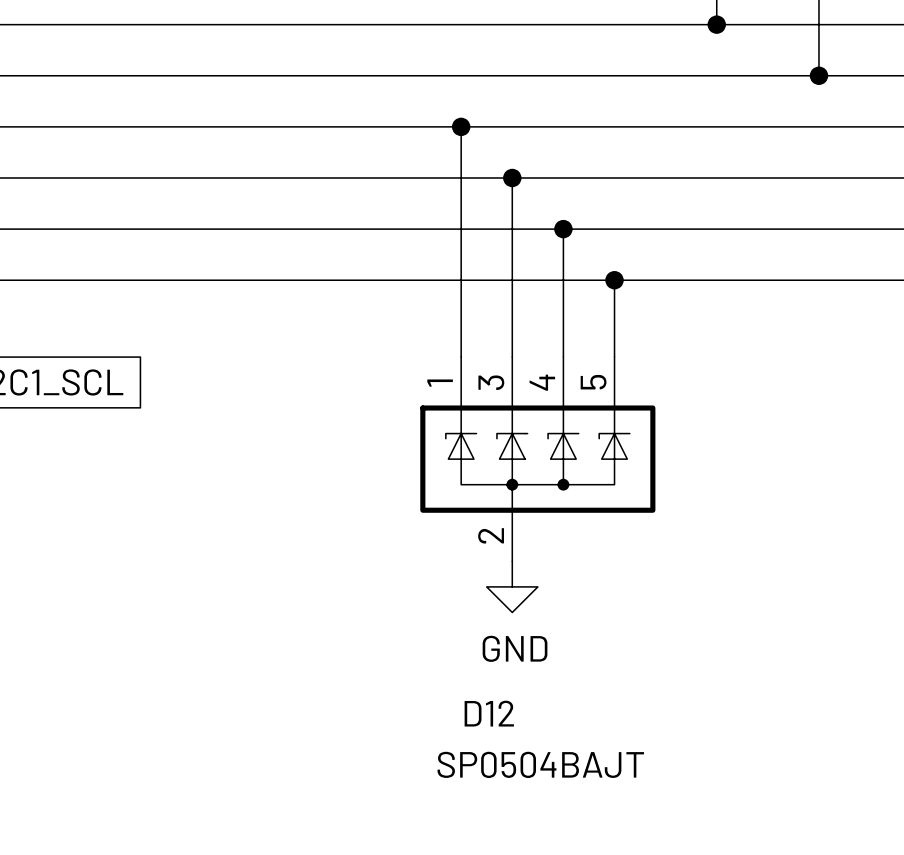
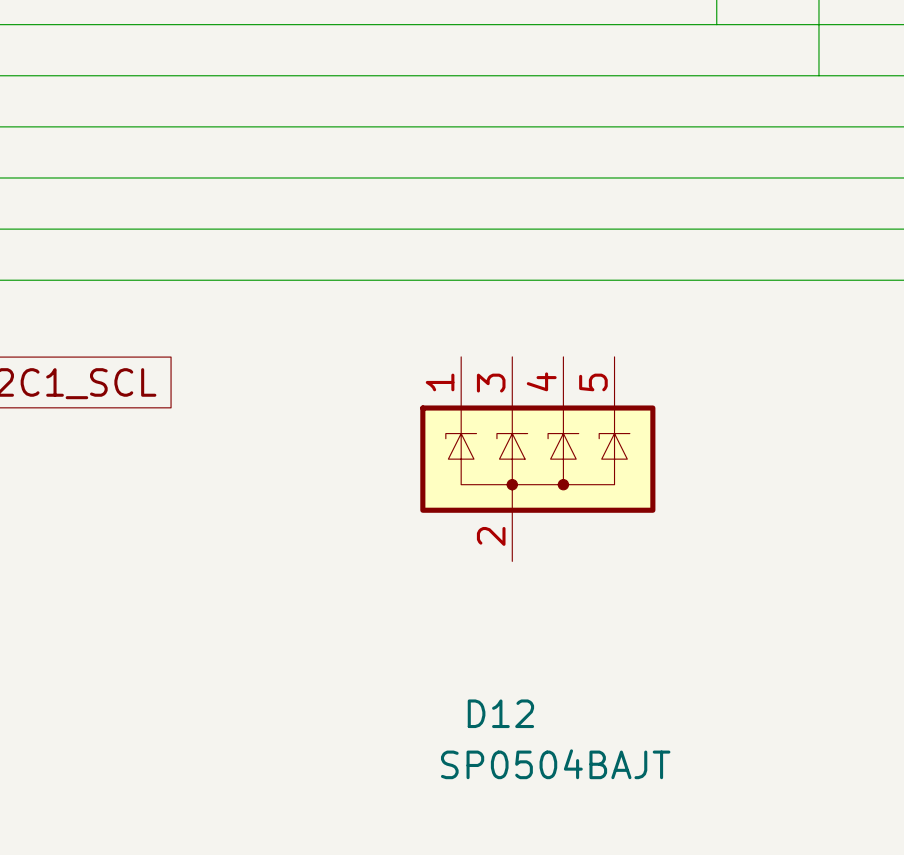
junction: (716, 24) -> none
junction: (818, 75) -> none
wire: (461, 126) (461, 356) -> none
junction: (461, 126) -> none
wire: (512, 177) (512, 356) -> none
junction: (512, 177) -> none
wire: (563, 229) (563, 356) -> none
junction: (563, 229) -> none
wire: (614, 280) (614, 356) -> none
junction: (614, 280) -> none
power symbol: GND (512, 586) -> none

